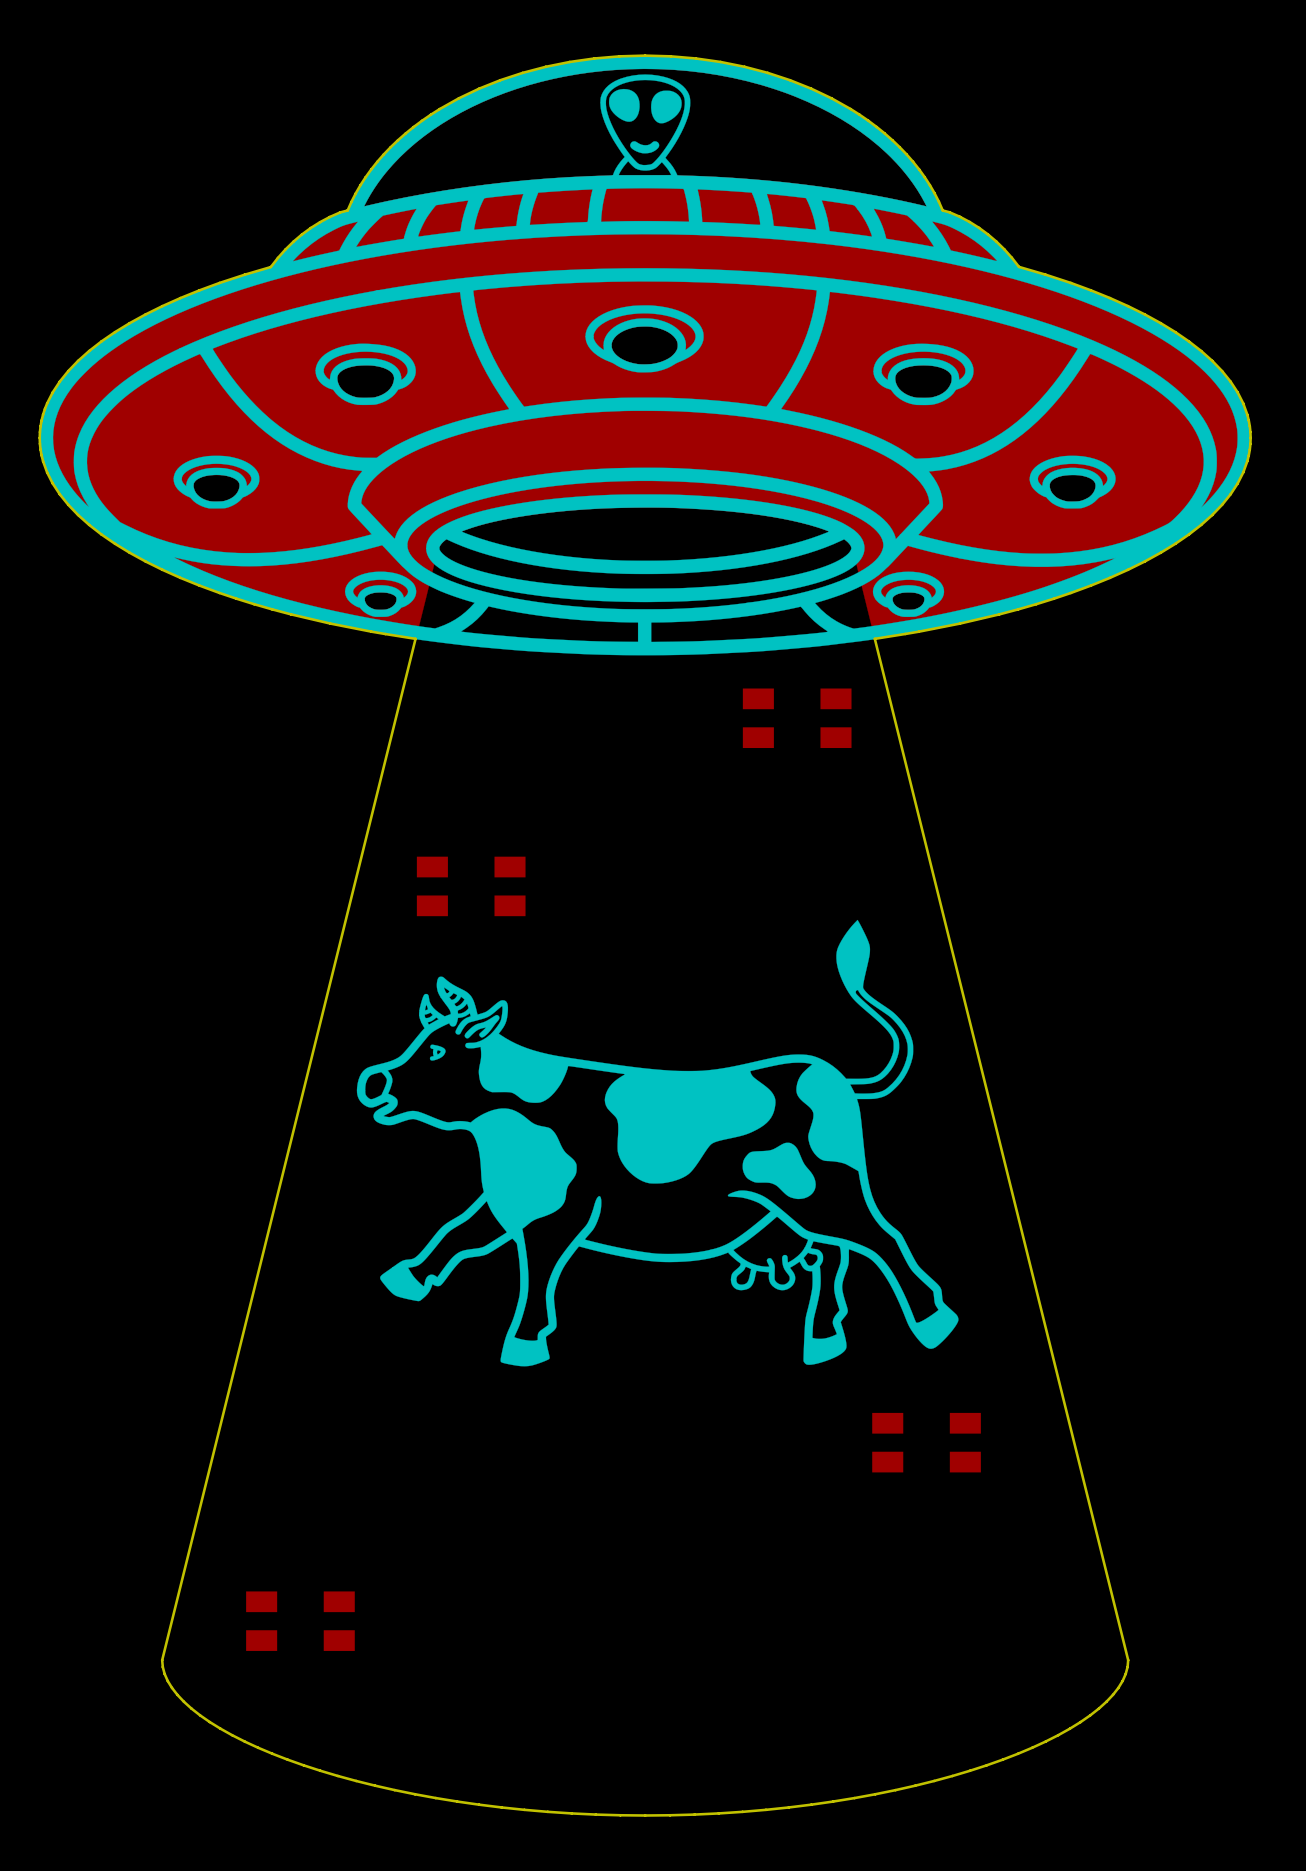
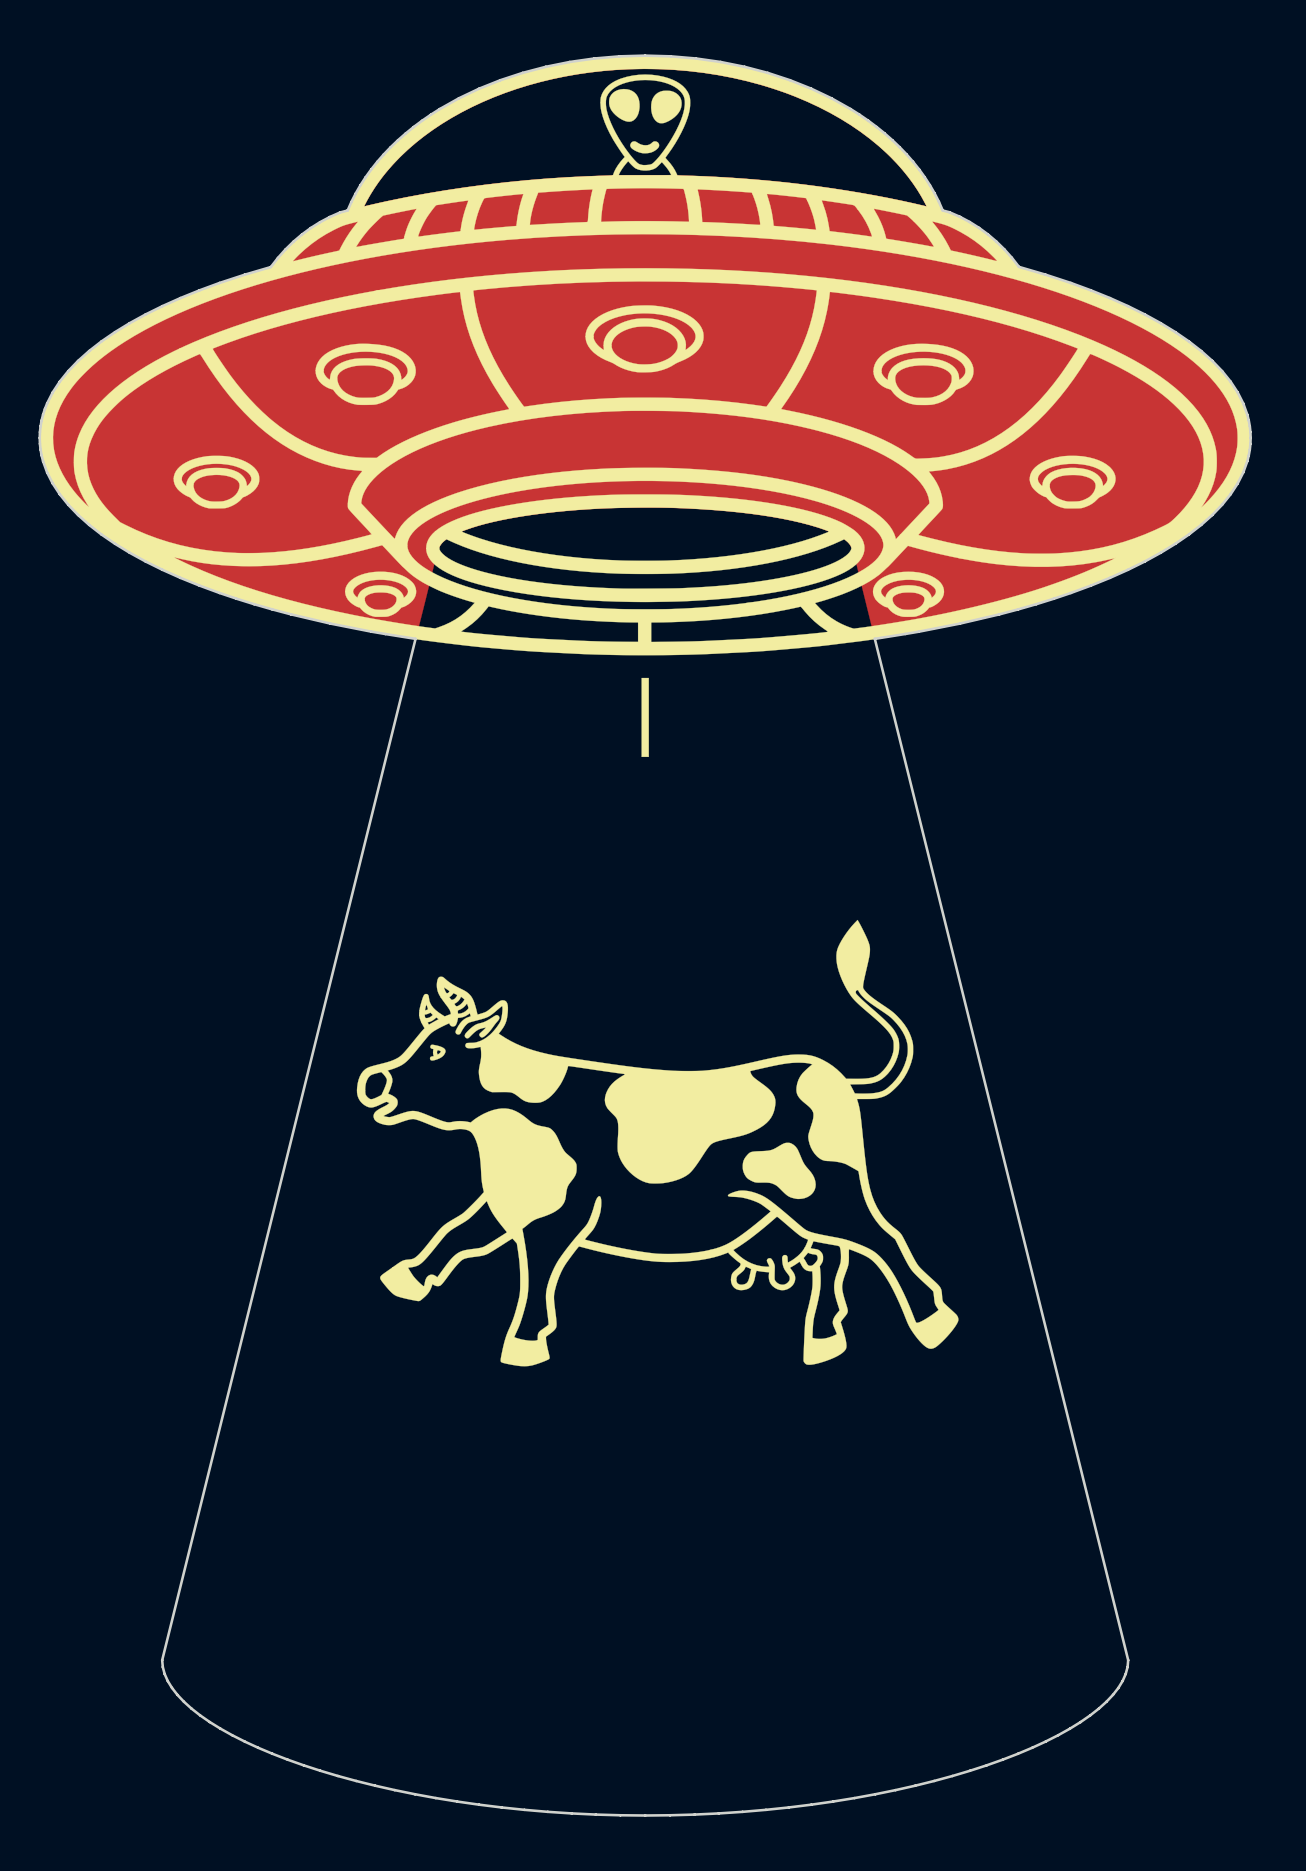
drawing shape: [38, 54, 1252, 1817] -> [38, 54, 1252, 1817]
part: (797, 718) -> none
part: (471, 886) -> none
part: (926, 1442) -> none
part: (300, 1621) -> none

